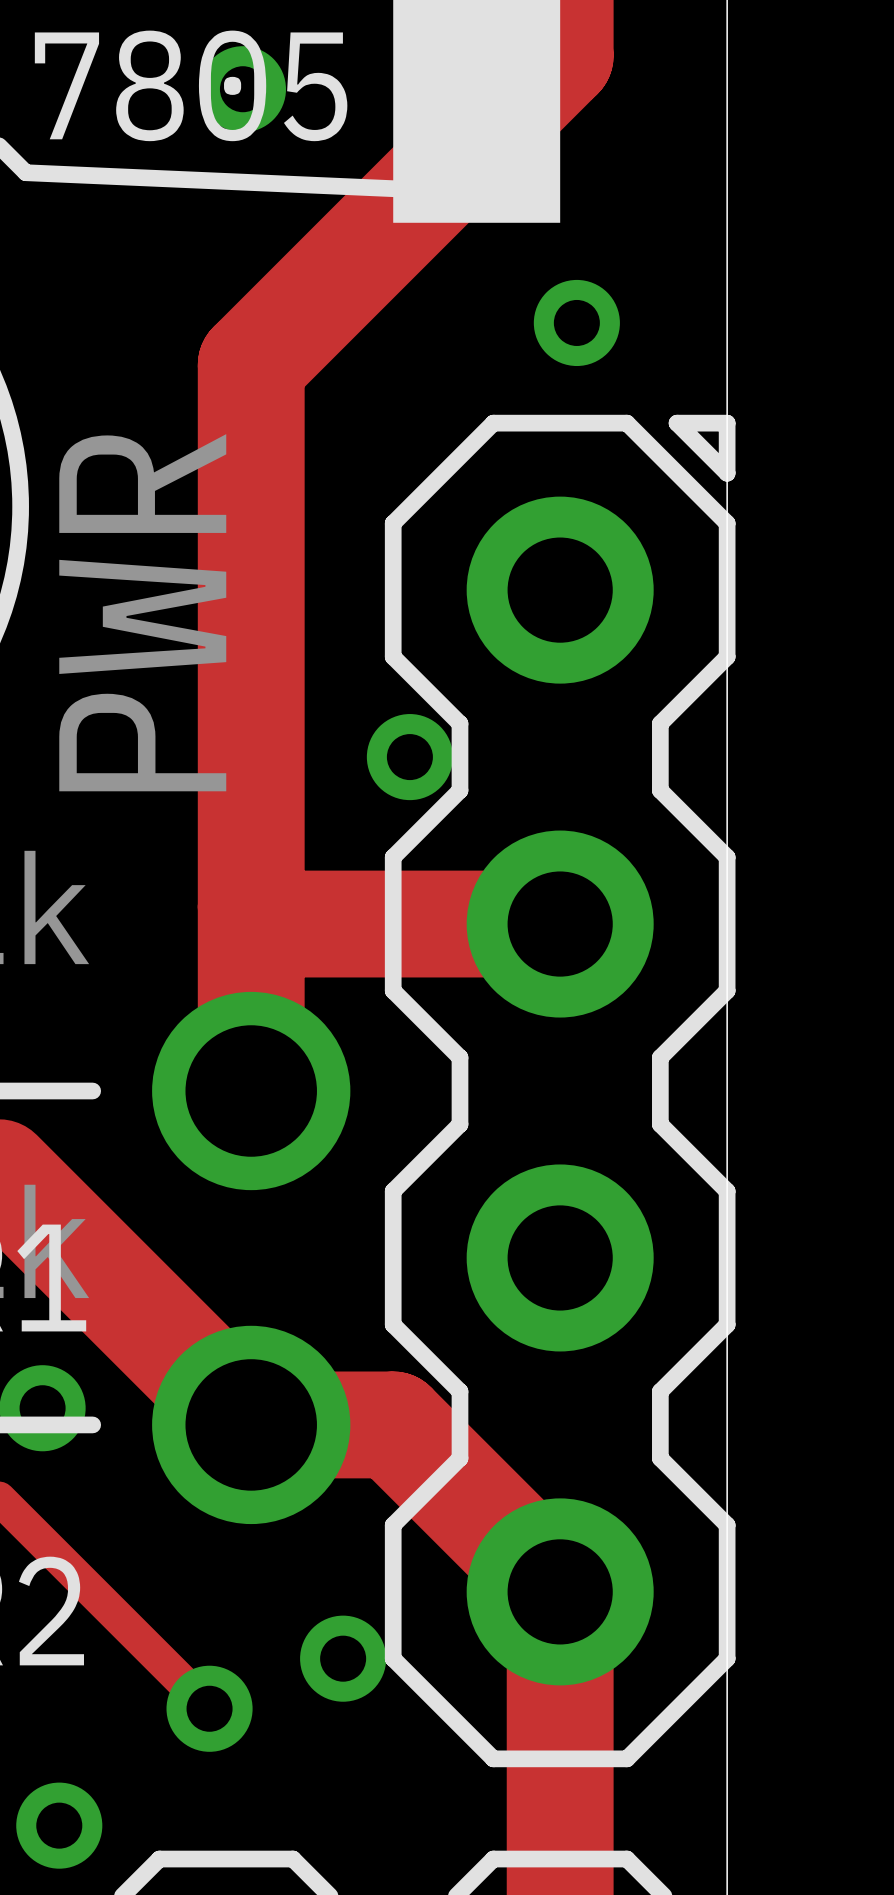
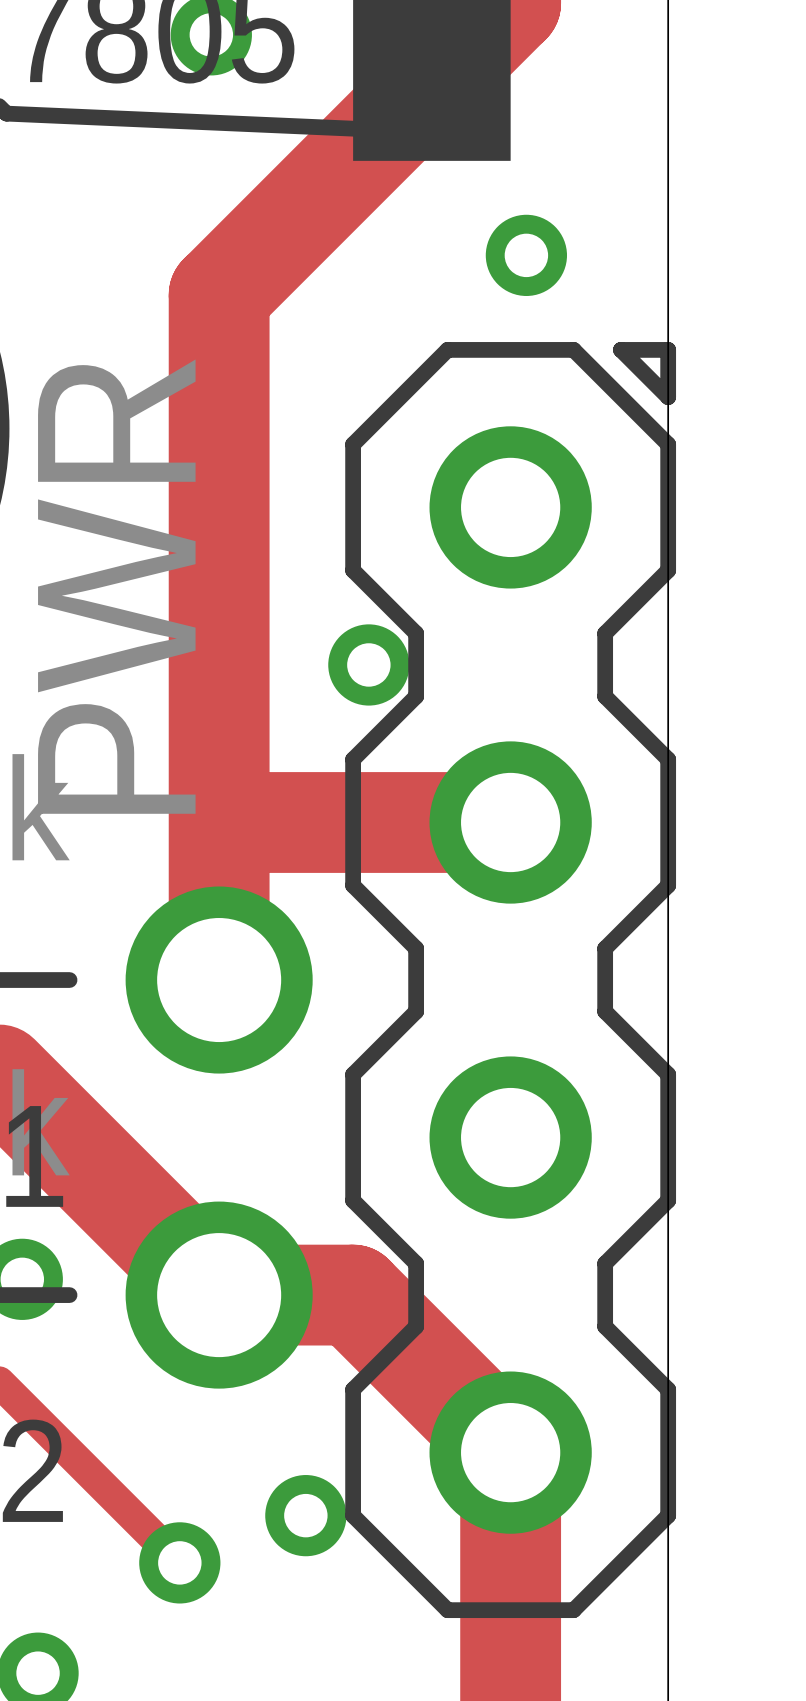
part footprint: [384, 414, 736, 1768] -> [345, 342, 677, 1619]

